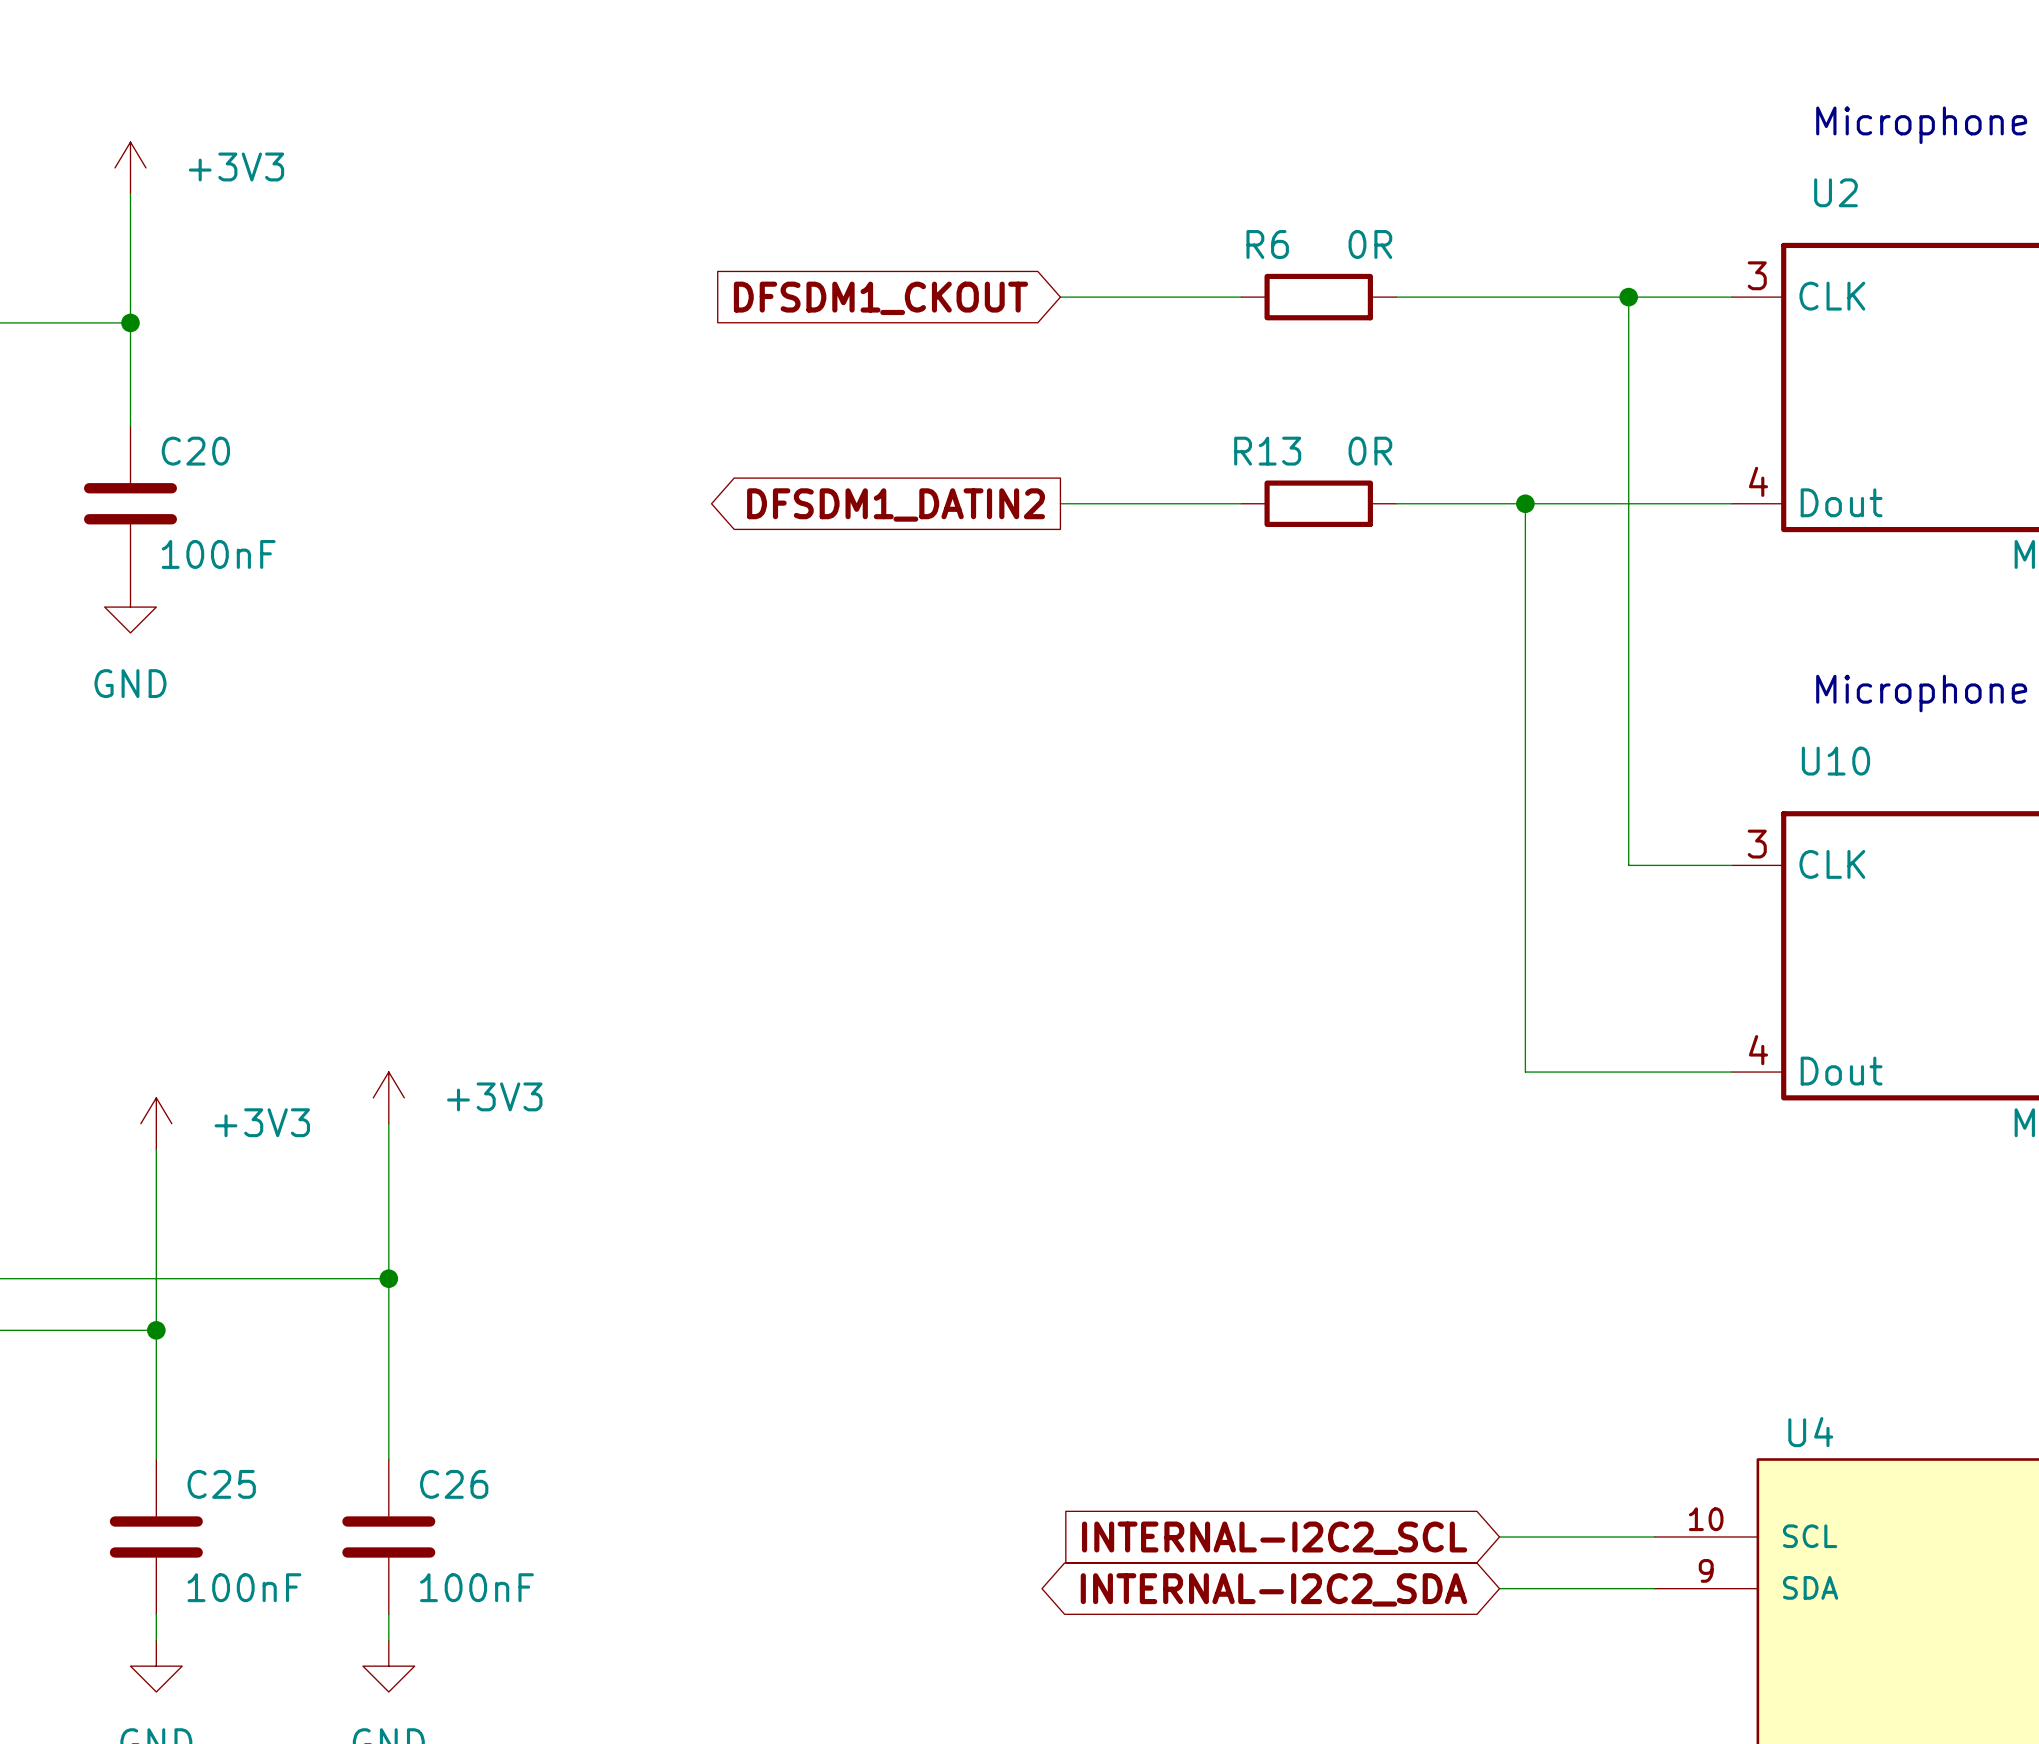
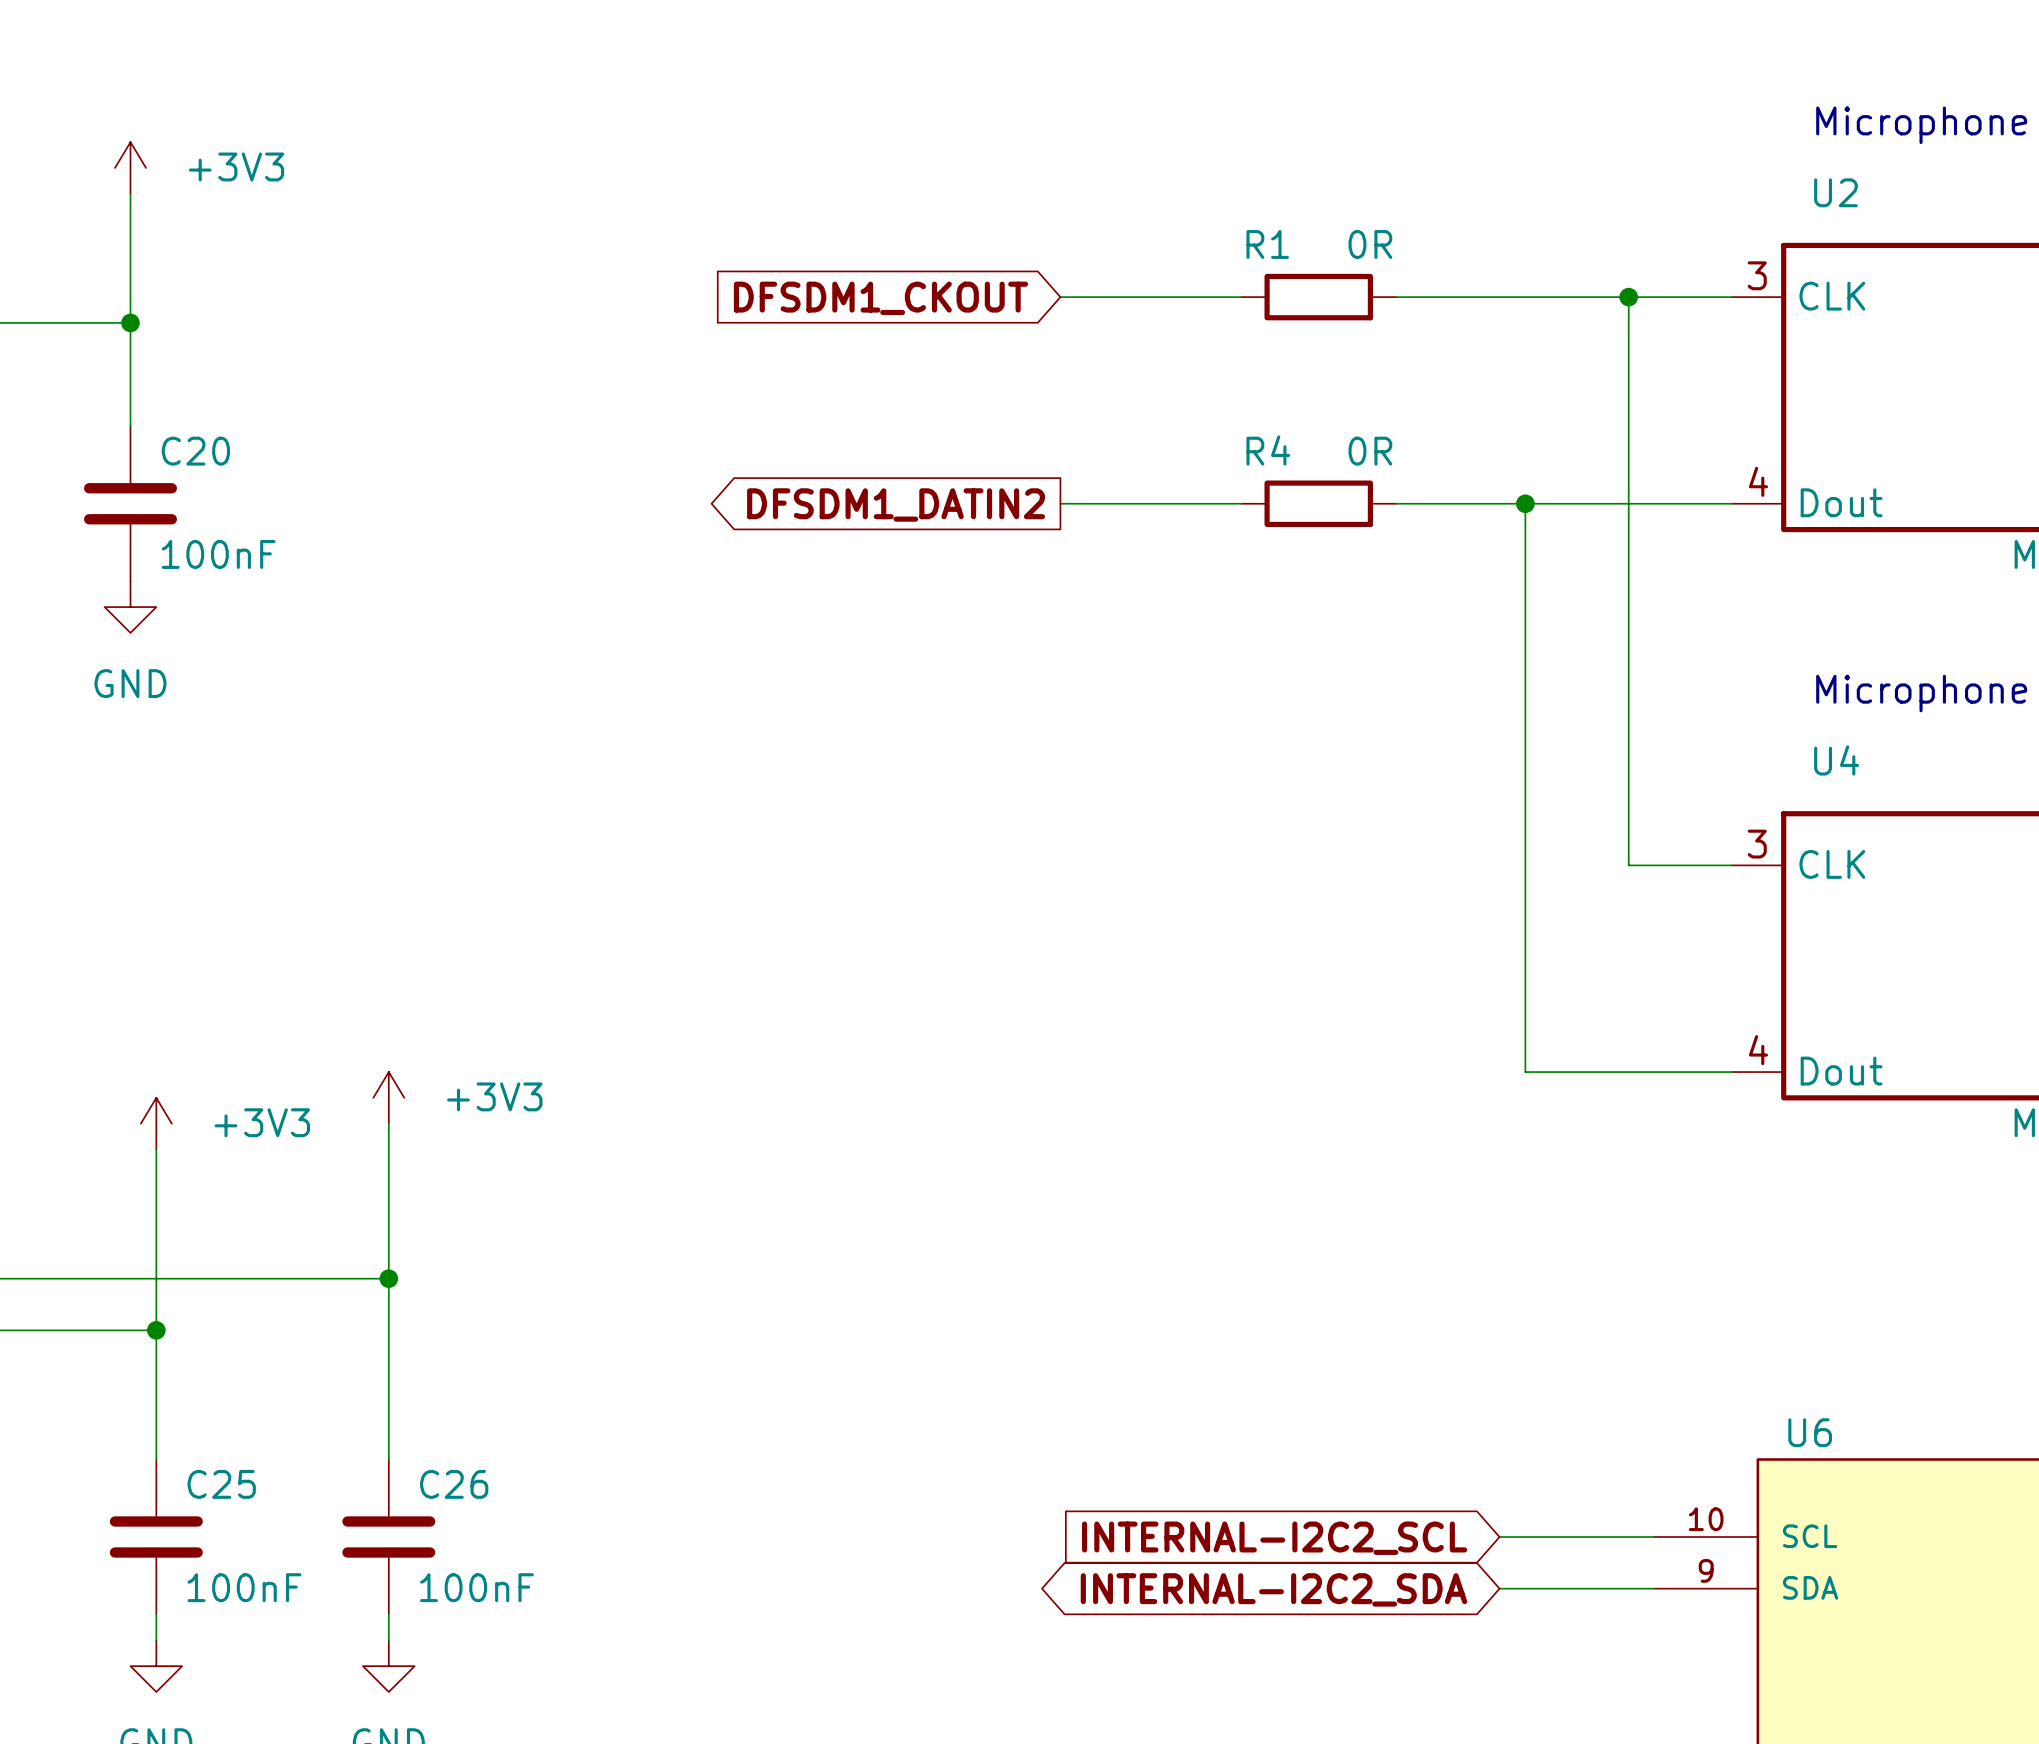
R6 name: R6 (1267, 244) -> R1 (1267, 244)
R13 name: R13 (1267, 451) -> R4 (1268, 450)
U10 name: U10 (1835, 761) -> U4 (1836, 760)
U4 name: U4 (1810, 1432) -> U6 (1810, 1432)

